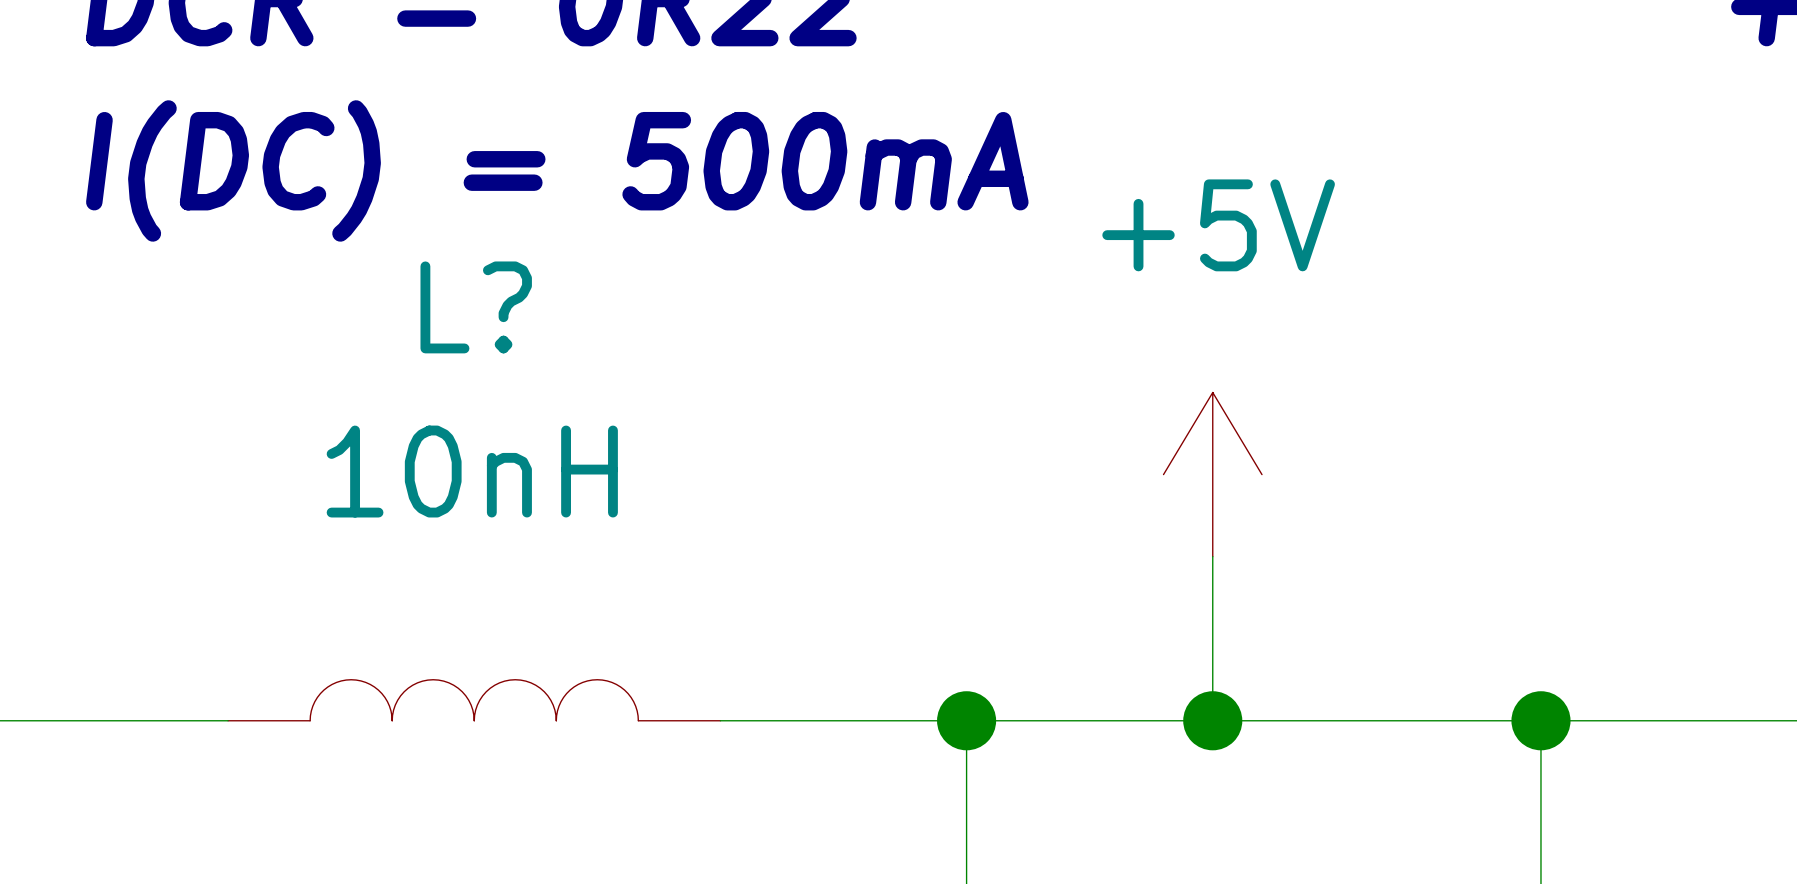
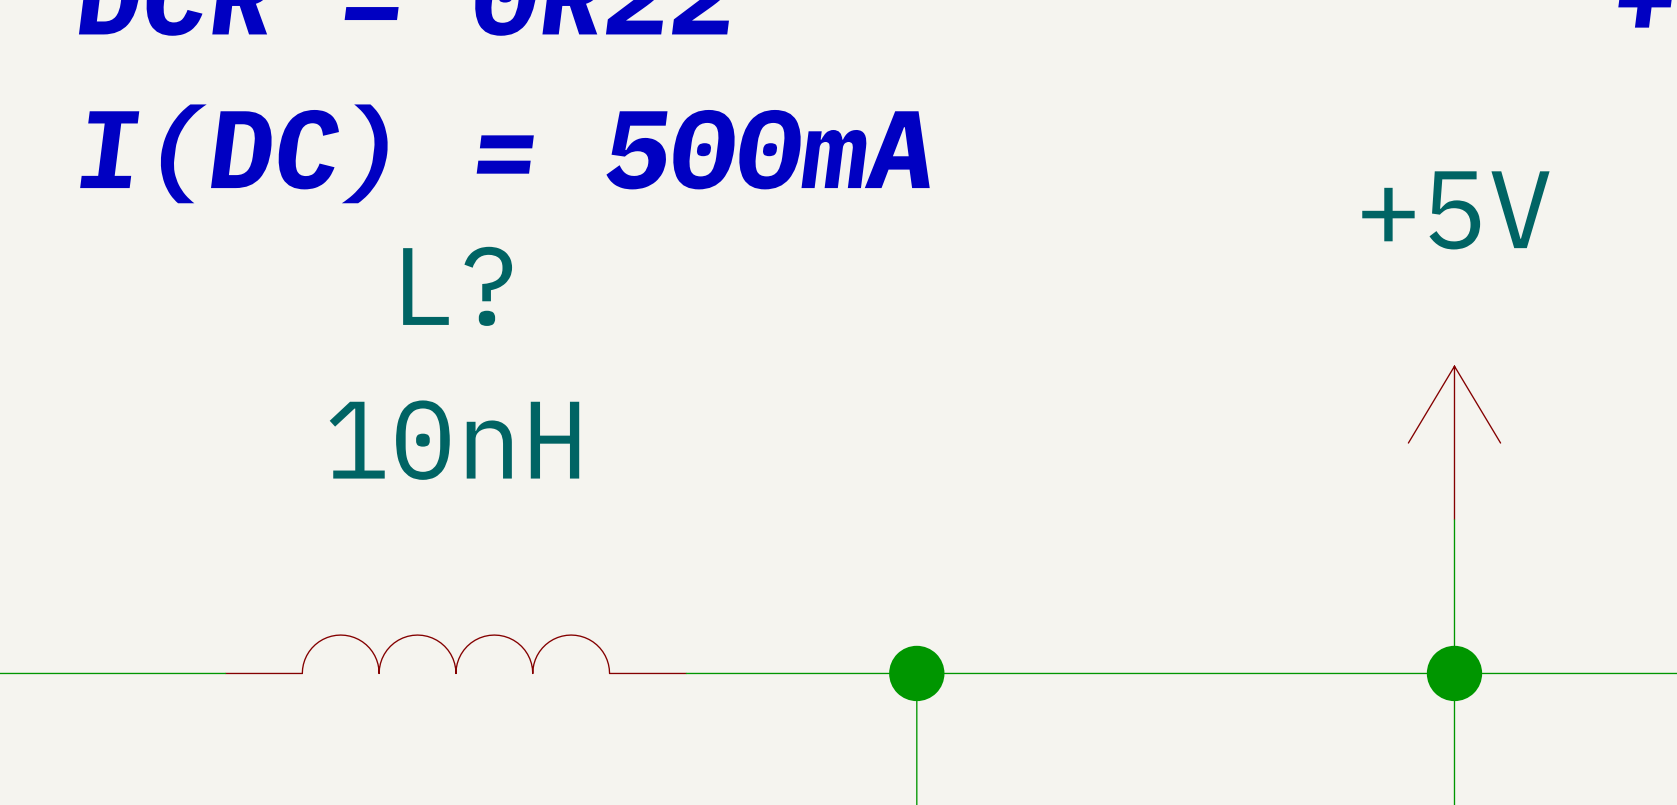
power symbol position: +5V (1212, 474) -> +5V (1454, 443)
wire: (1212, 556) (1212, 720) -> (1454, 519) (1454, 673)
junction: (1212, 720) -> none

